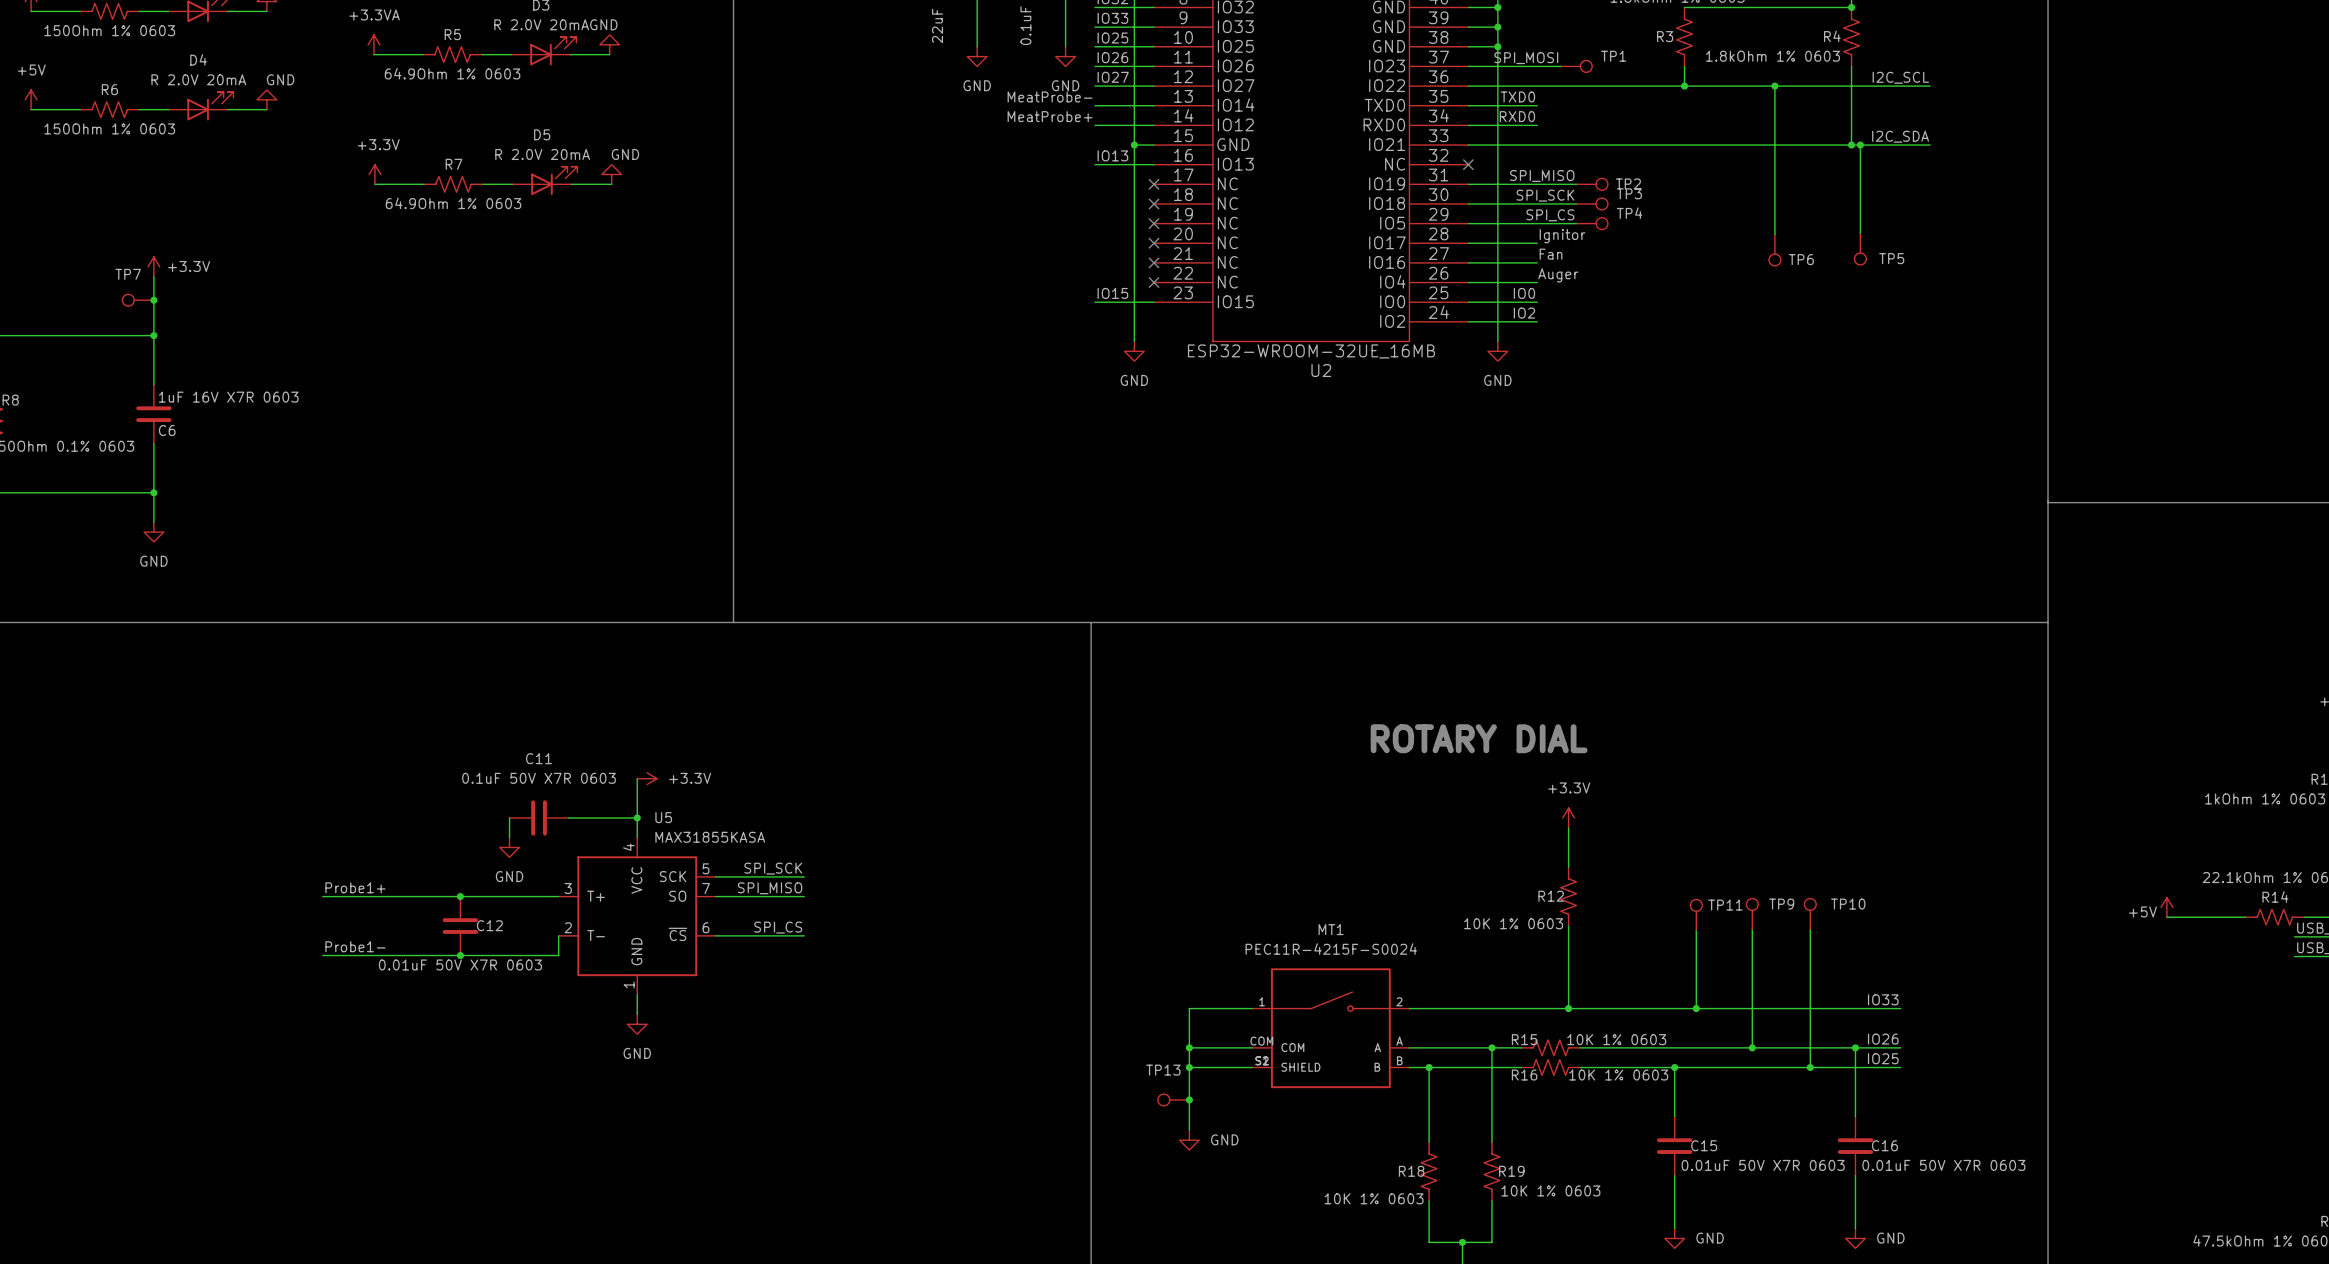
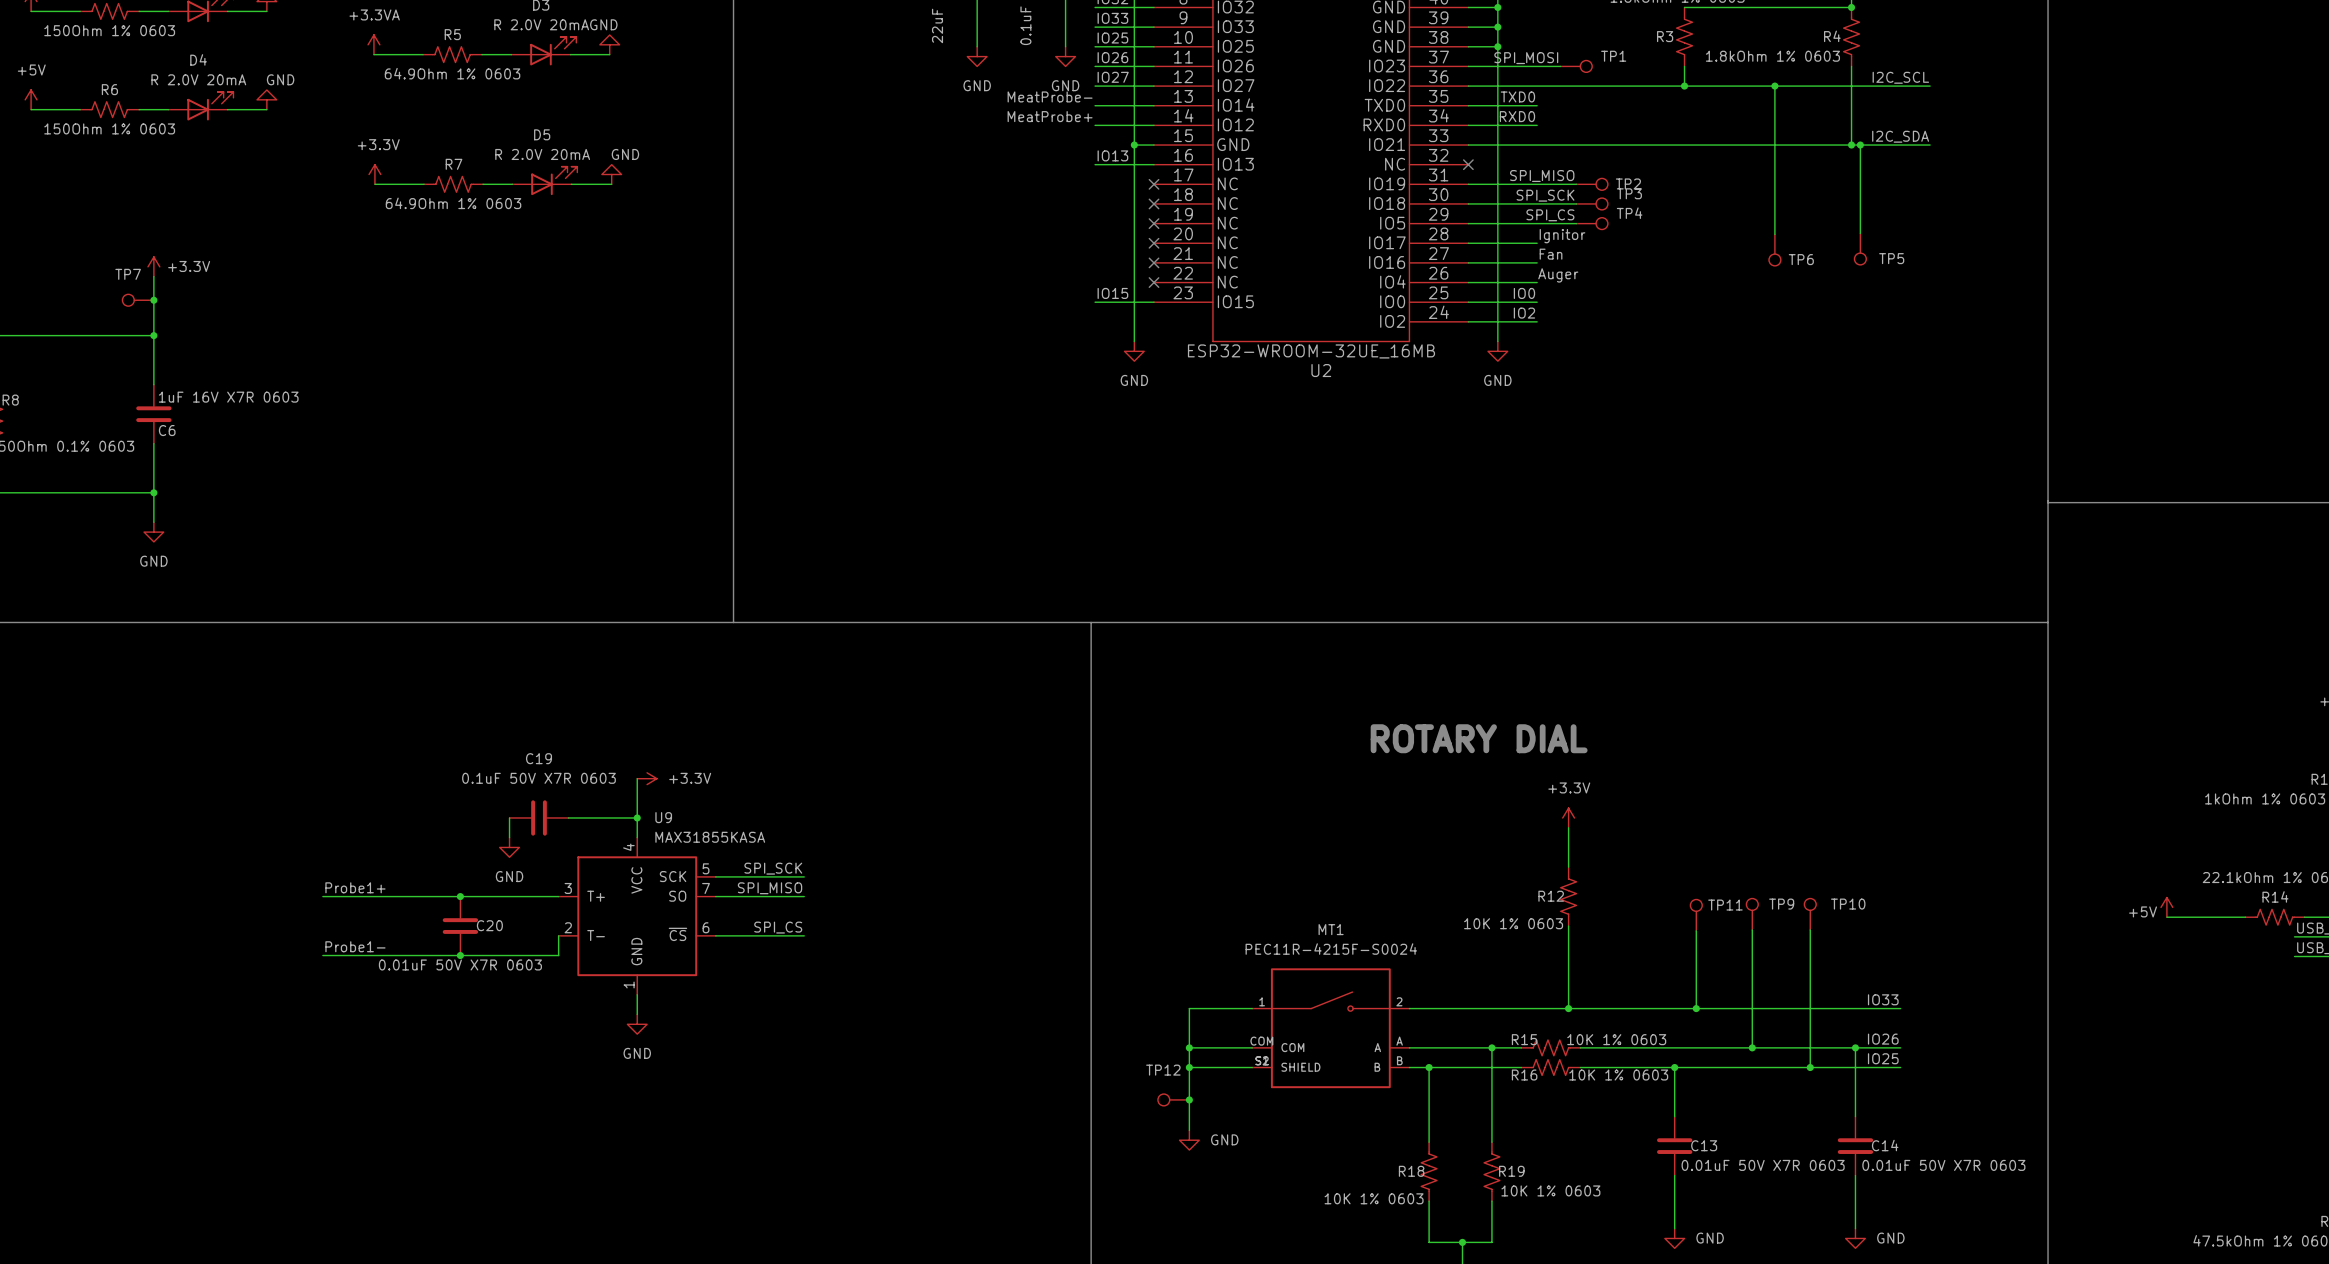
C11 name: C11 (539, 758) -> C19 (539, 758)
U5 name: U5 (663, 817) -> U9 (663, 817)
C12 name: C12 (489, 925) -> C20 (489, 925)
TP13 name: TP13 (1163, 1070) -> TP12 (1163, 1070)
C15 name: C15 (1704, 1145) -> C13 (1704, 1145)
C16 name: C16 (1884, 1145) -> C14 (1885, 1145)

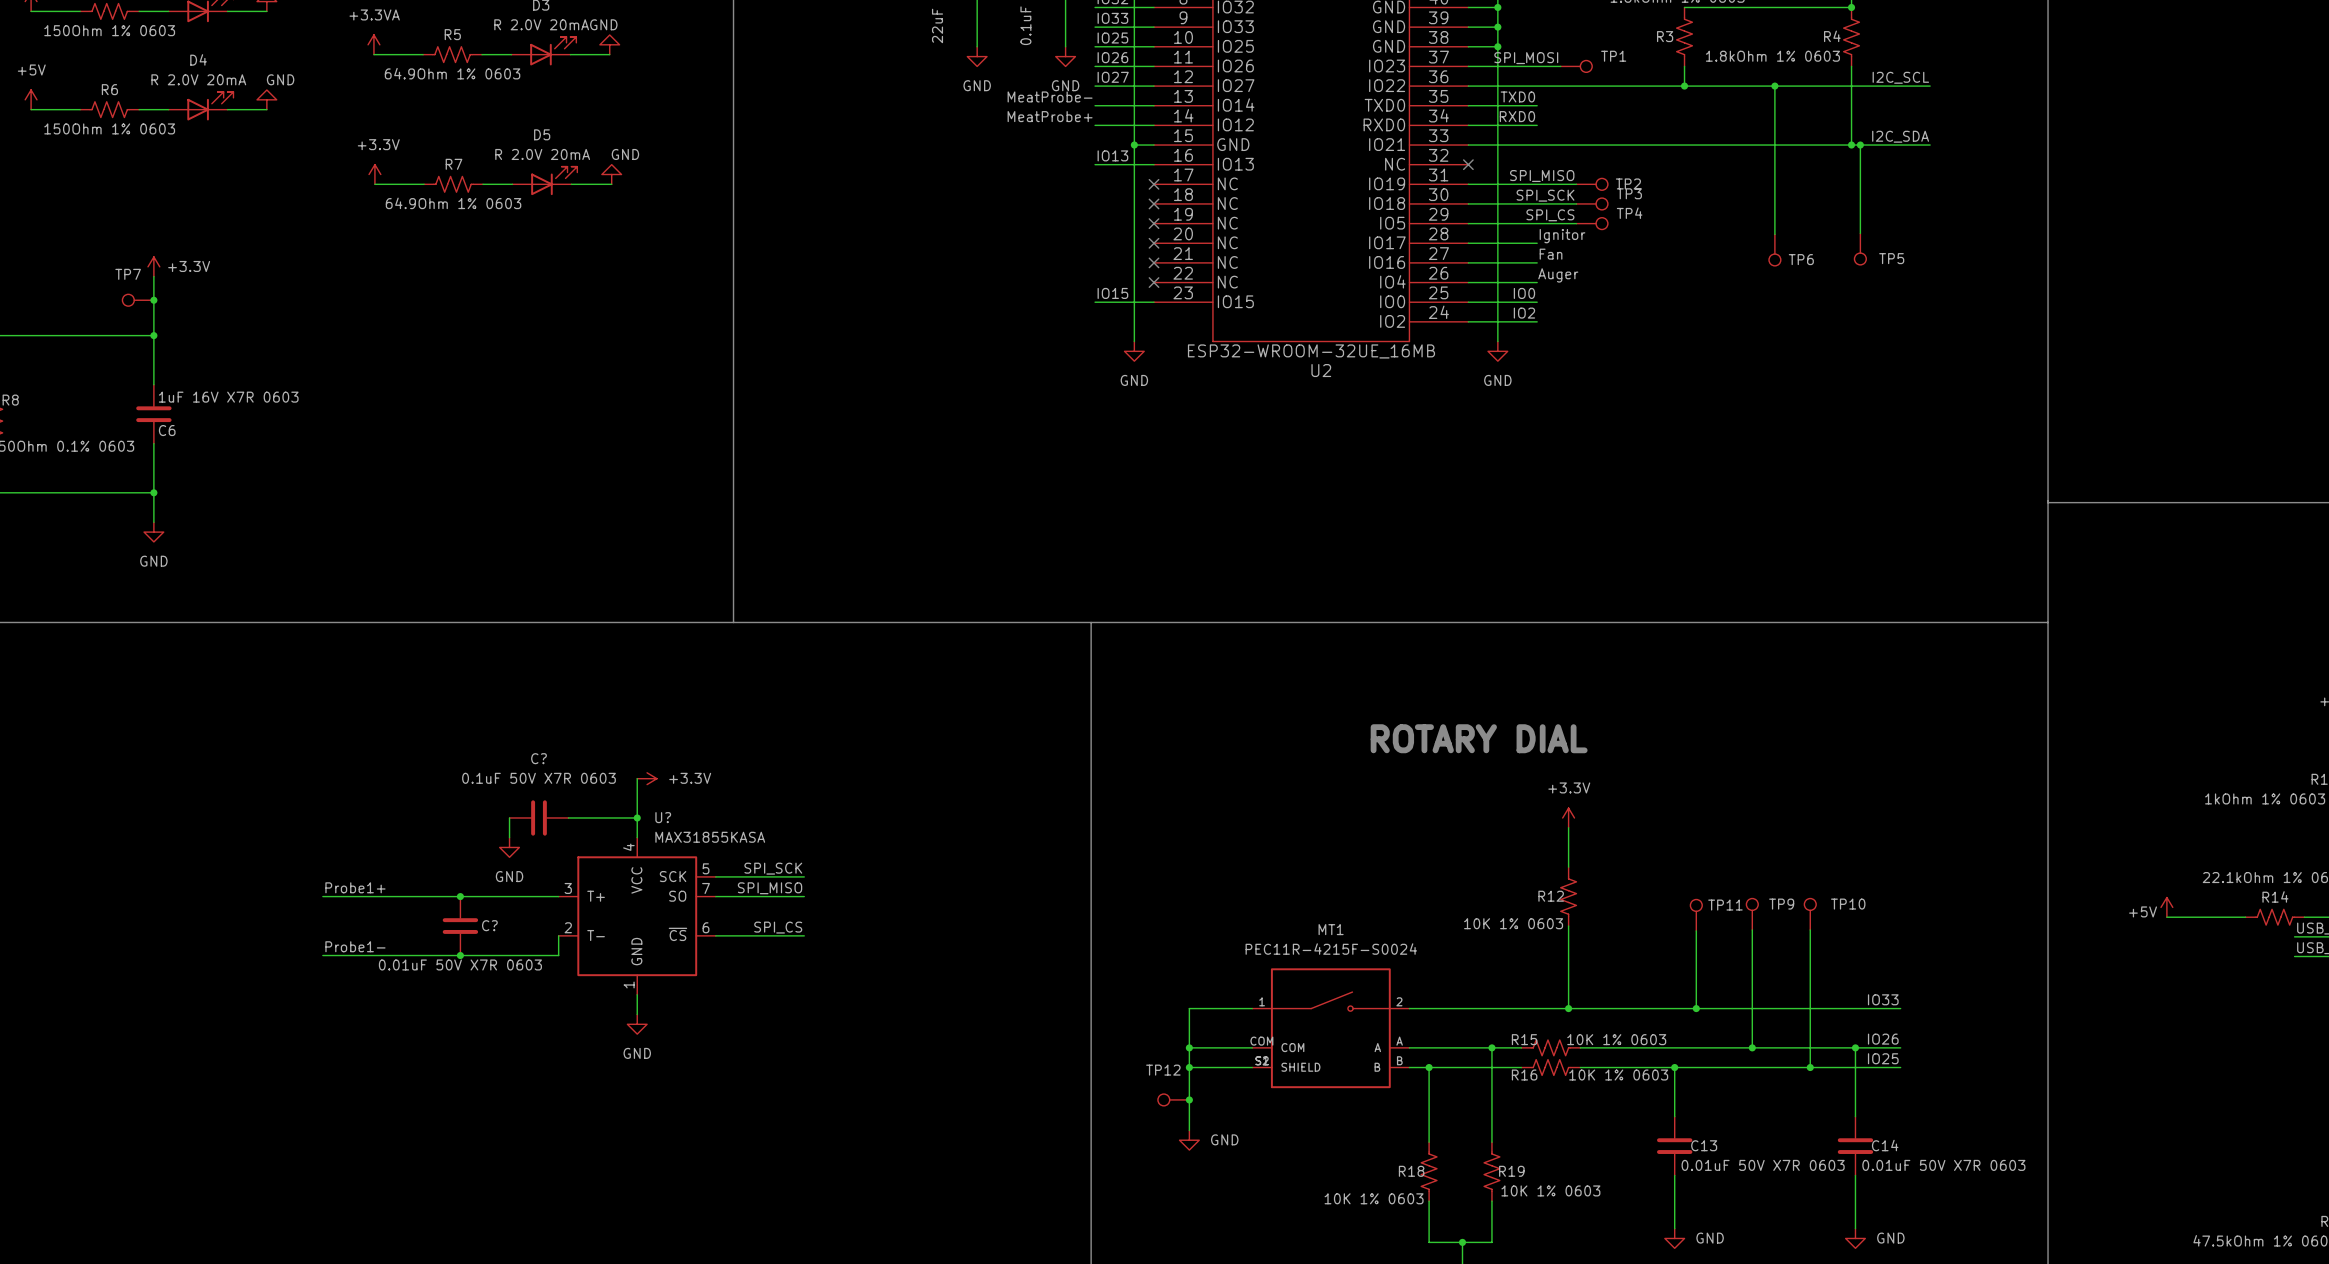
C19 name: C19 (539, 758) -> C? (539, 758)
U9 name: U9 (663, 817) -> U? (663, 817)
C20 name: C20 (489, 925) -> C? (489, 925)

